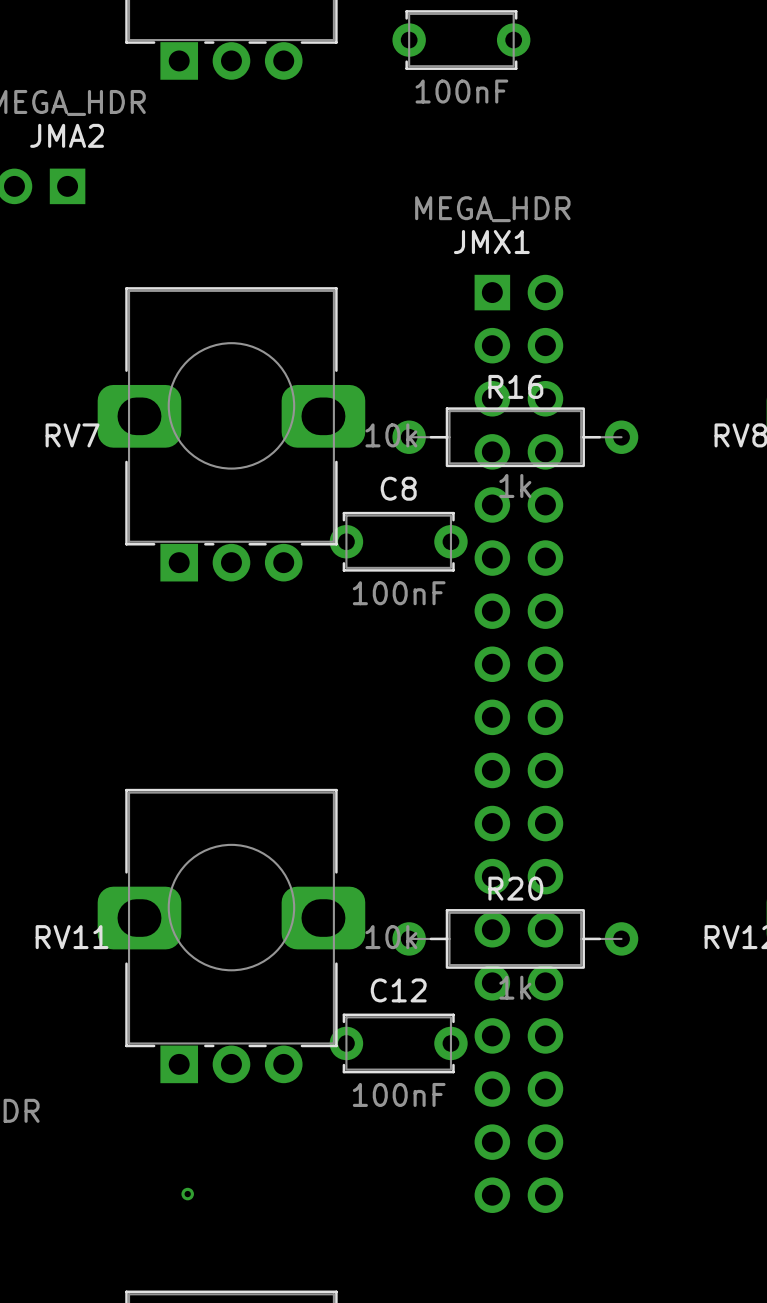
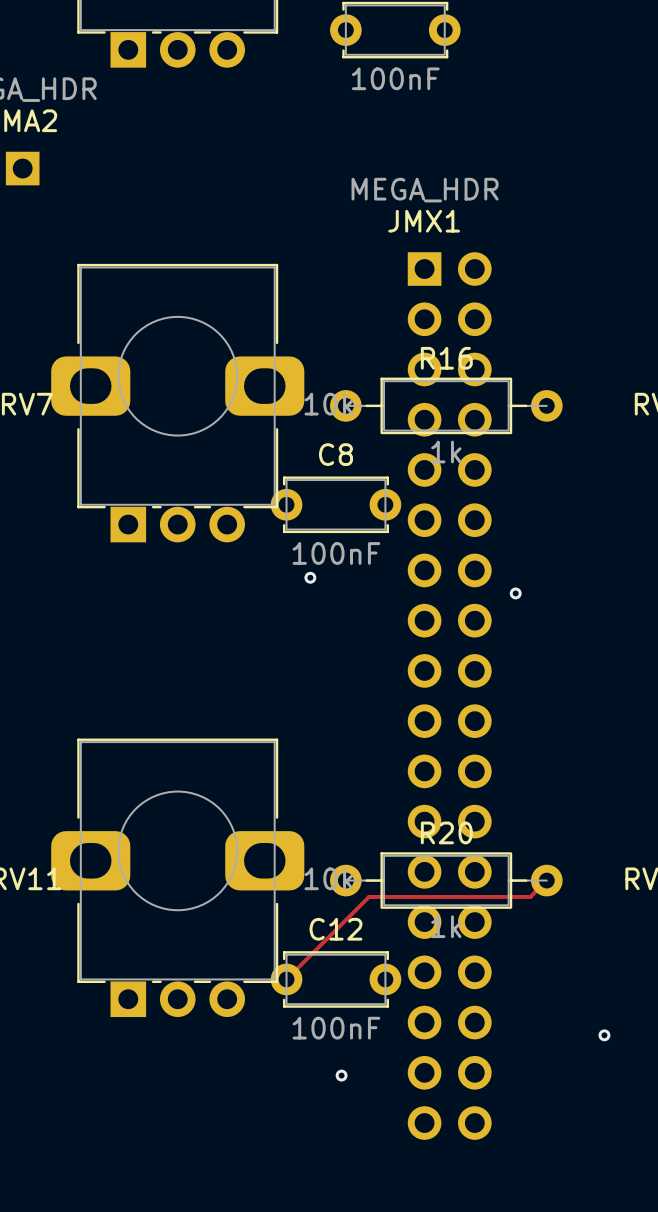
via: none -> (310, 577)
via: none -> (515, 593)
track: none -> (546, 880) (530, 896) (369, 896) (286, 979)
via: none -> (604, 1035)
via: none -> (341, 1075)
via: (187, 1194) -> none

